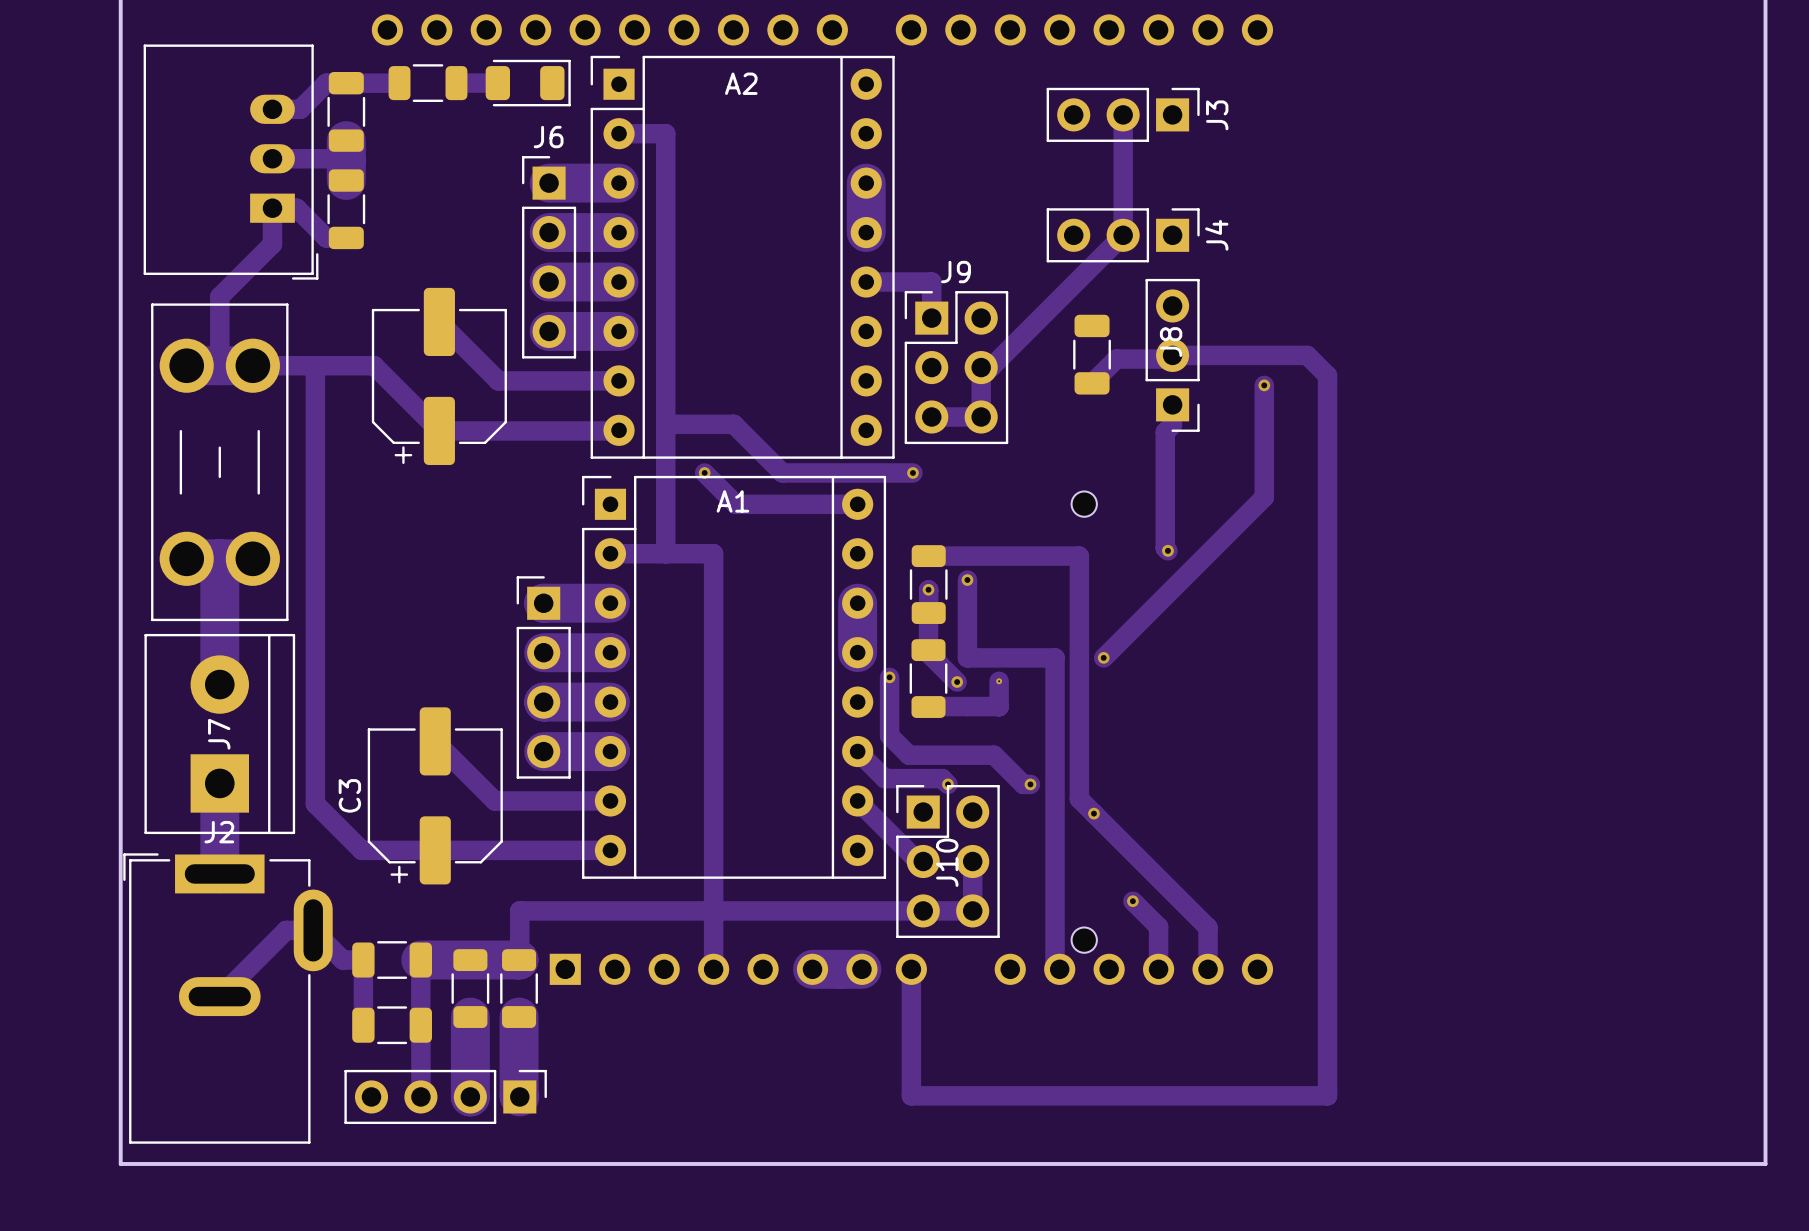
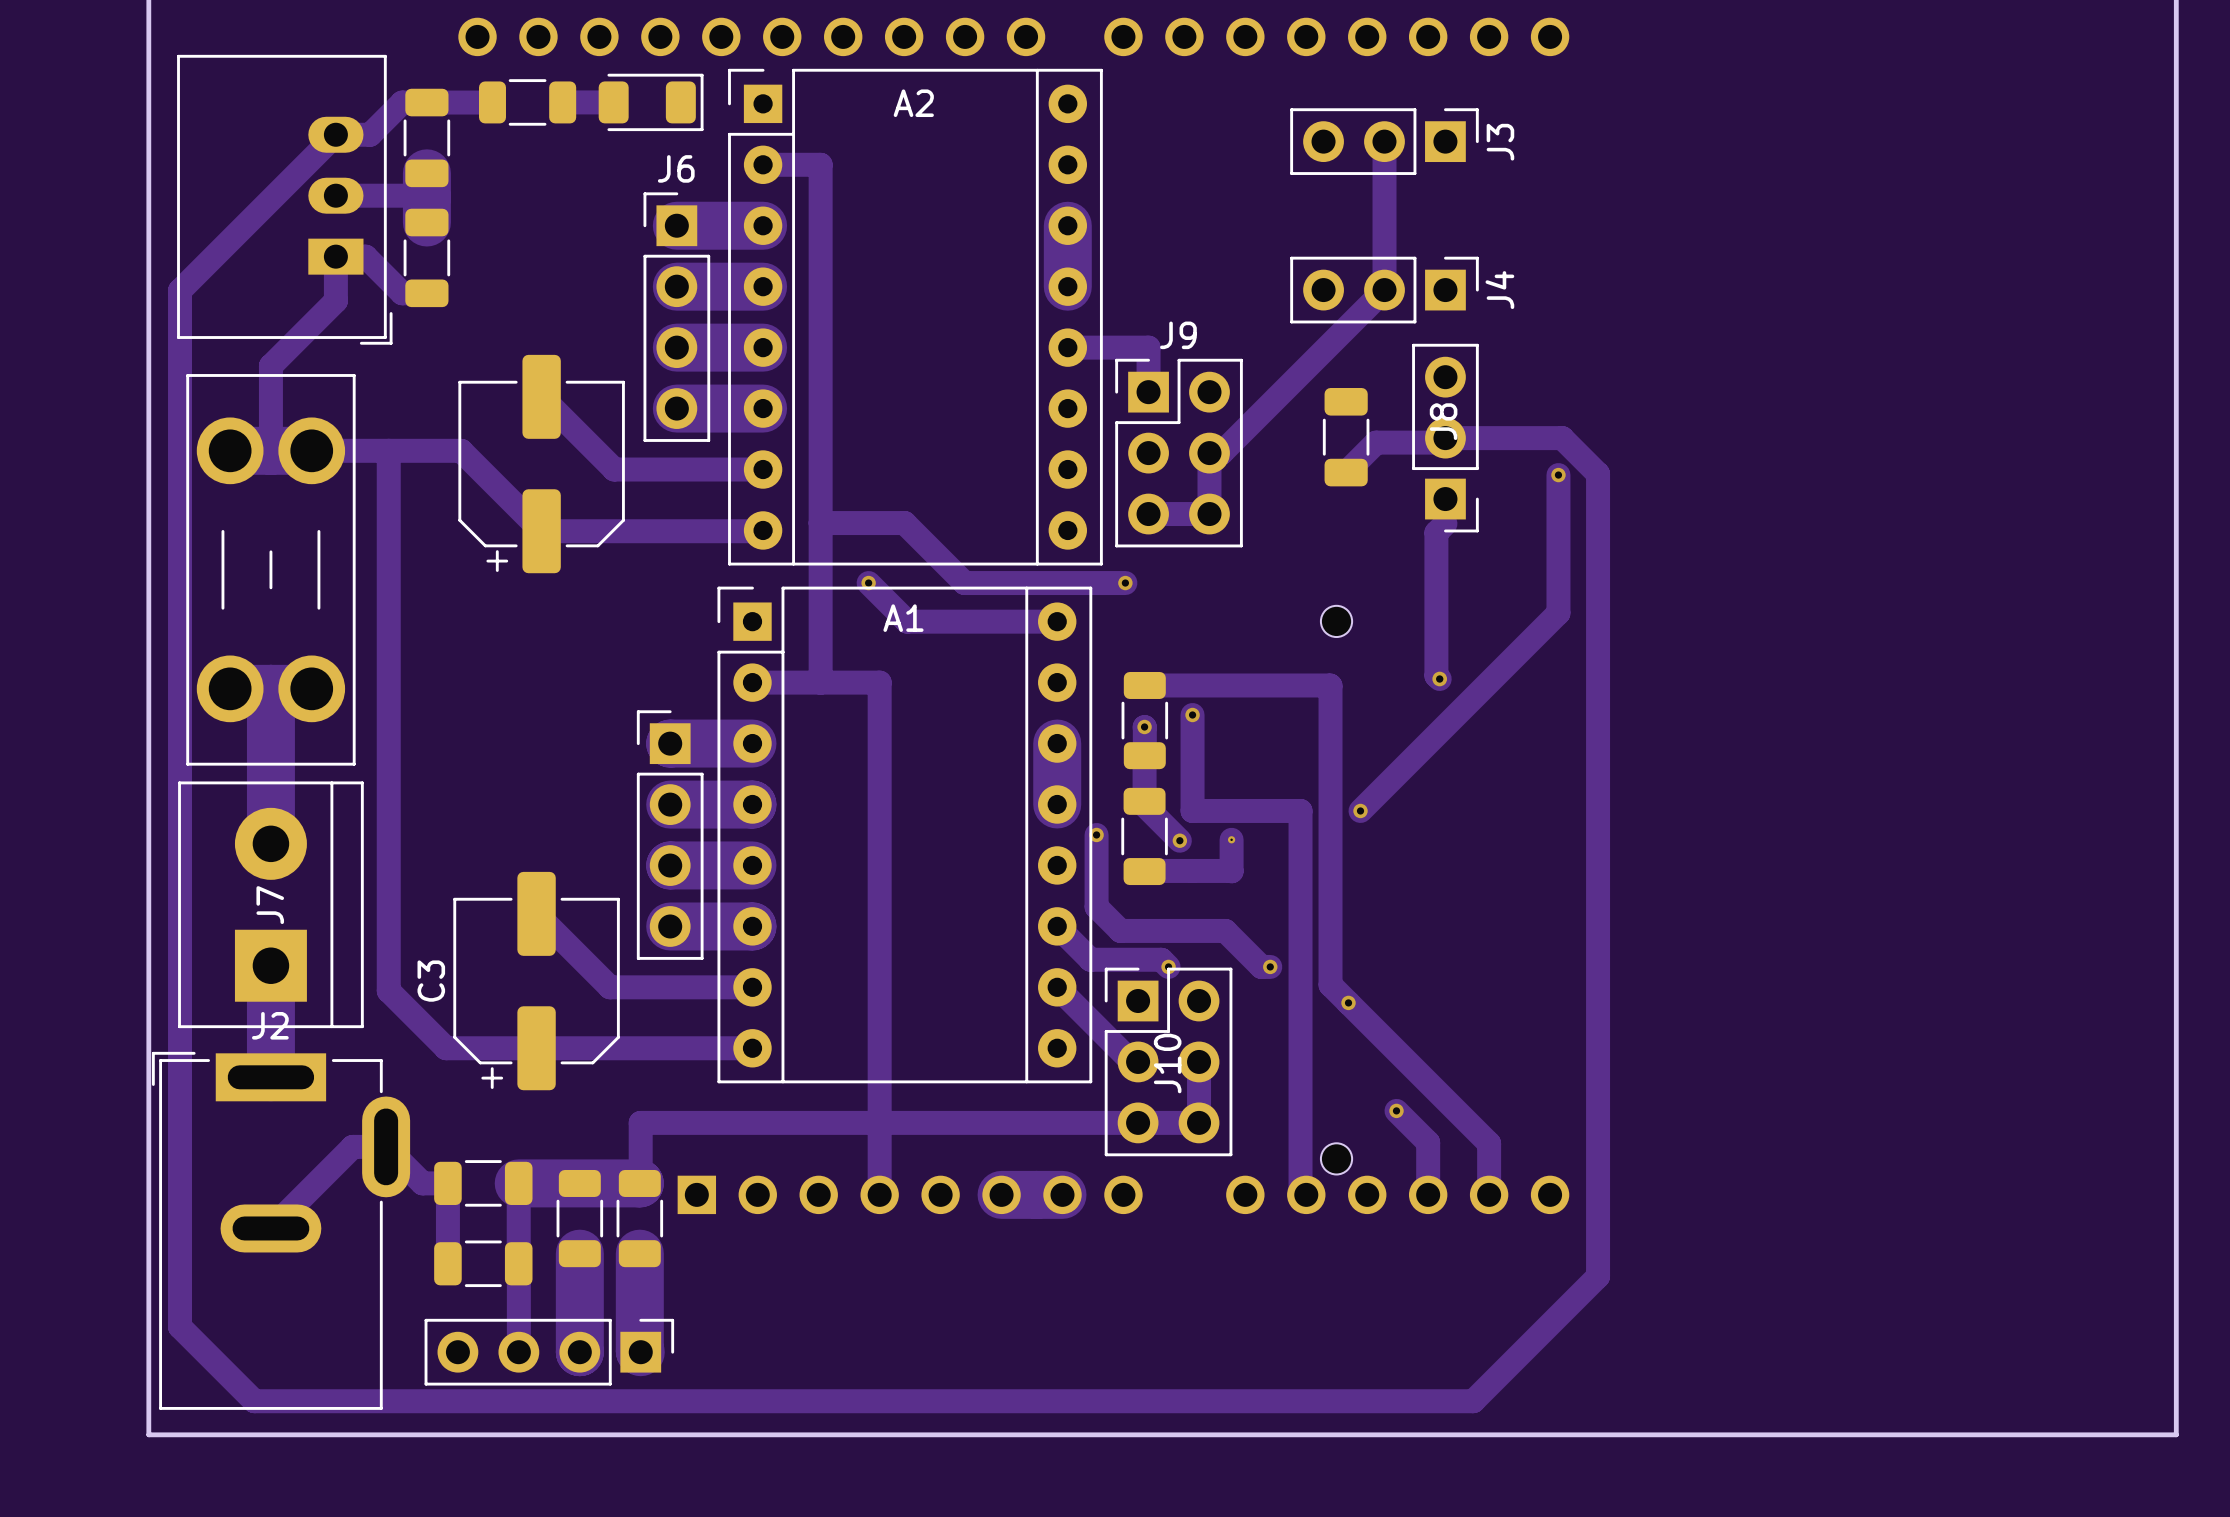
track: (1267, 355) (1307, 355) (1327, 375) (1327, 1095) (911, 1095) (911, 969) -> (1562, 438) (1598, 473) (1598, 1276) (1473, 1401) (254, 1401) (180, 1326) (180, 290) (335, 134)

